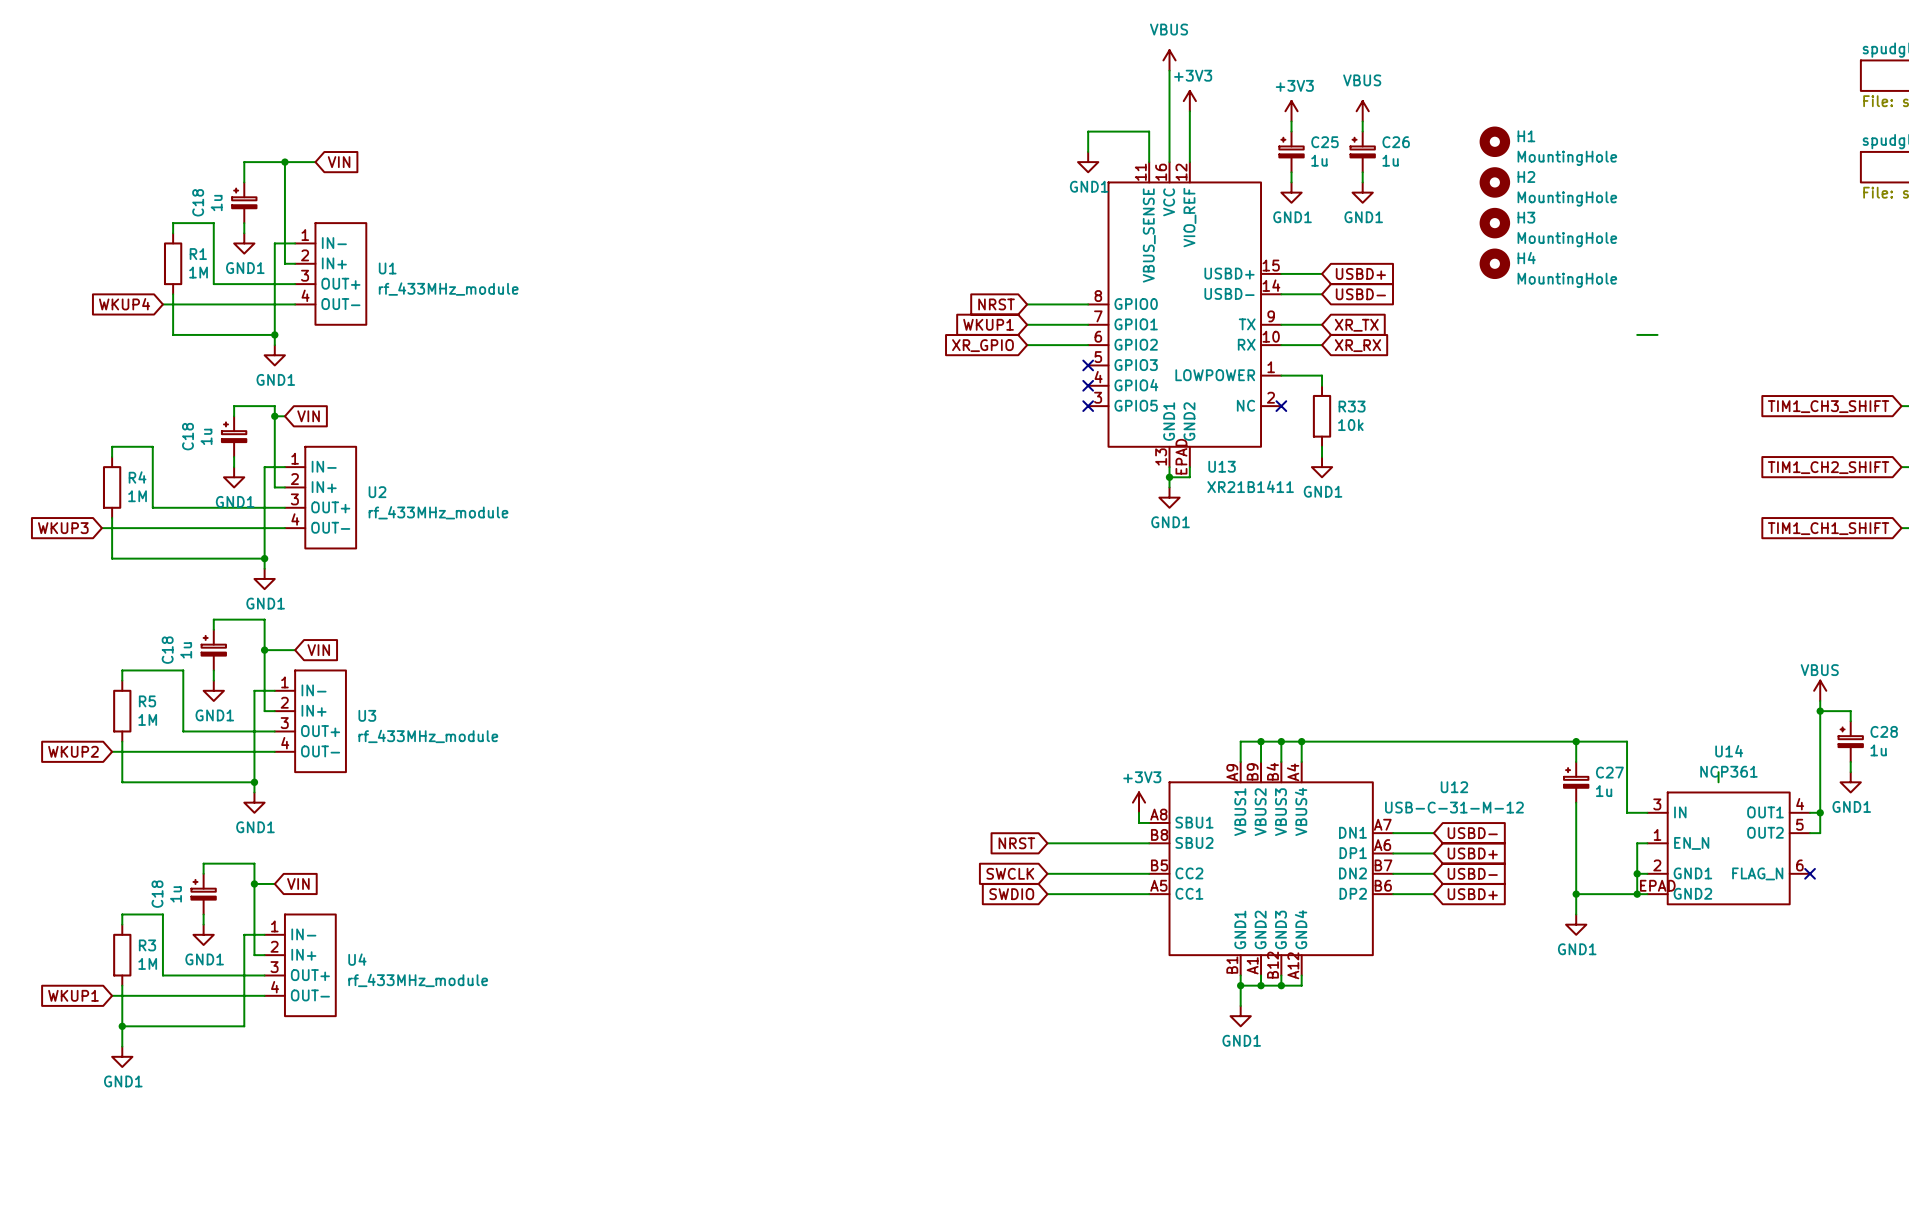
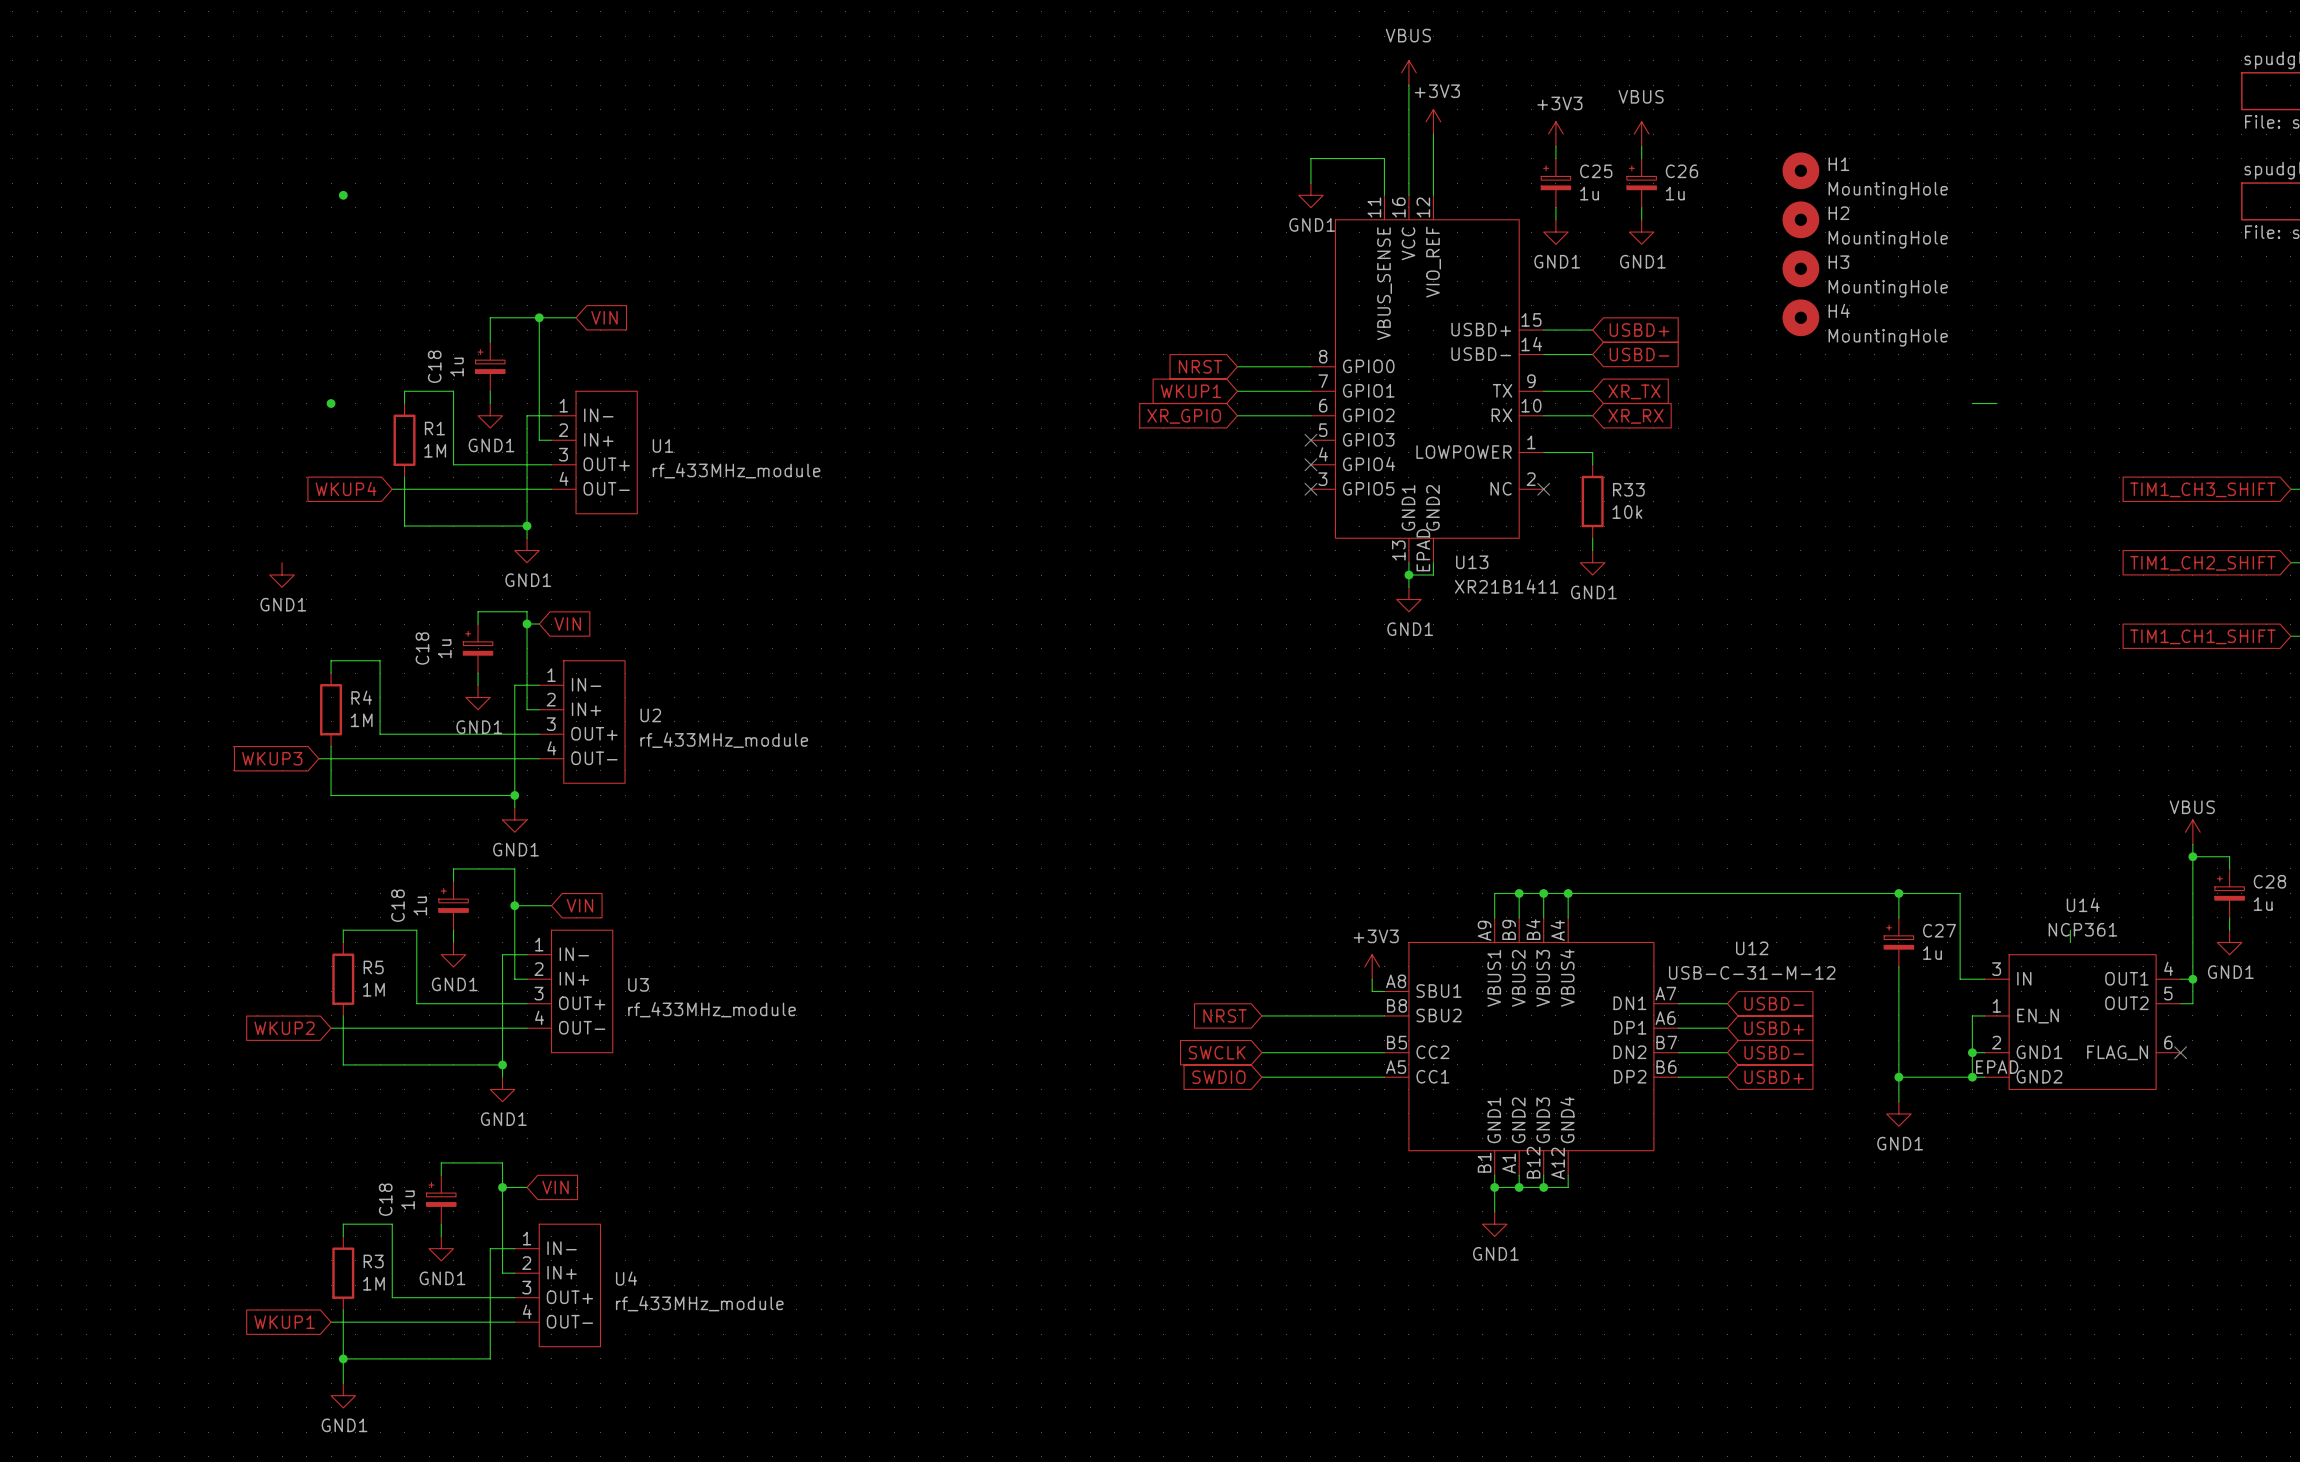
wire: (284, 162) (284, 263) (295, 263) -> (539, 317) (539, 440) (551, 440)
wire: (315, 162) (244, 162) (244, 182) -> (576, 317) (490, 317) (490, 342)
global label: VIN (339, 162) -> none
C18: 1u (244, 202) -> none
wire: (244, 223) (244, 233) -> (490, 391) (490, 403)
wire: (173, 233) (173, 223) (213, 223) (213, 284) (295, 284) -> (404, 403) (404, 391) (453, 391) (453, 464) (551, 464)
power symbol: GND1 (244, 243) -> none
wire: (295, 243) (274, 243) (274, 345) -> (551, 415) (527, 415) (527, 538)
R1 position: (173, 263) -> (404, 440)
junction: none -> (539, 317)
global label: none -> VIN (604, 317)
U1 position: (330, 273) -> (594, 452)
wire: (173, 294) (173, 334) (274, 334) -> (404, 477) (404, 526) (527, 526)
global label position: WKUP4 (124, 304) -> WKUP4 (346, 488)
wire: (162, 304) (295, 304) -> (392, 489) (551, 489)
C18: none -> 1u (490, 366)
power symbol: none -> GND1 (490, 415)
power symbol: GND1 (274, 355) -> none
wire: (234, 416) (234, 406) (274, 406) (274, 487) (284, 487) -> (478, 624) (478, 611) (527, 611) (527, 709) (539, 709)
junction: (274, 416) -> none
global label: VIN (308, 416) -> none
C18: 1u (234, 436) -> none
junction: none -> (527, 526)
wire: (112, 456) (112, 446) (152, 446) (152, 507) (284, 507) -> (331, 673) (331, 660) (380, 660) (380, 734) (539, 734)
wire: (234, 456) (234, 467) -> (478, 673) (478, 685)
power symbol: none -> GND1 (527, 550)
wire: (284, 467) (264, 467) (264, 568) -> (539, 685) (514, 685) (514, 807)
R4 position: (112, 487) -> (331, 709)
U2 position: (320, 497) -> (582, 721)
wire: (112, 517) (112, 558) (264, 558) -> (331, 746) (331, 795) (514, 795)
junction: none -> (527, 624)
global label: none -> VIN (567, 624)
global label position: WKUP3 (63, 528) -> WKUP3 (272, 758)
wire: (101, 528) (284, 528) -> (318, 758) (539, 758)
C18: none -> 1u (478, 648)
junction: (264, 558) -> none
power symbol: GND1 (264, 578) -> none
power symbol: none -> GND1 (478, 697)
wire: (213, 629) (213, 619) (264, 619) (264, 711) (274, 711) -> (453, 881) (453, 868) (514, 868) (514, 979) (527, 979)
C18: 1u (213, 650) -> none
wire: (264, 650) (295, 650) -> (514, 905) (551, 905)
junction: (264, 650) -> none
global label: VIN (318, 650) -> none
junction: none -> (514, 795)
wire: (213, 670) (213, 680) -> (453, 930) (453, 942)
wire: (122, 680) (122, 670) (183, 670) (183, 731) (274, 731) -> (343, 942) (343, 930) (416, 930) (416, 1003) (527, 1003)
power symbol: none -> GND1 (514, 819)
power symbol: GND1 (213, 690) -> none
wire: (274, 690) (254, 690) (254, 792) -> (527, 954) (502, 954) (502, 1077)
R5 position: (122, 711) -> (343, 979)
U3 position: (310, 721) -> (569, 991)
wire: (122, 741) (122, 782) (254, 782) -> (343, 1015) (343, 1064) (502, 1064)
global label position: WKUP2 (73, 751) -> WKUP2 (284, 1028)
wire: (112, 751) (274, 751) -> (331, 1028) (527, 1028)
C18: none -> 1u (453, 905)
junction: none -> (514, 905)
global label: none -> VIN (579, 905)
junction: (254, 782) -> none
power symbol: none -> GND1 (453, 954)
power symbol: GND1 (254, 802) -> none
wire: (203, 873) (203, 863) (254, 863) (254, 955) (264, 955) -> (441, 1175) (441, 1162) (502, 1162) (502, 1273) (514, 1273)
wire: (254, 883) (274, 883) -> (502, 1187) (527, 1187)
junction: (254, 883) -> none
global label: VIN (298, 883) -> none
junction: none -> (502, 1064)
C18: 1u (203, 894) -> none
power symbol: none -> GND1 (502, 1089)
wire: (203, 914) (203, 924) -> (441, 1224) (441, 1236)
wire: (122, 924) (122, 914) (162, 914) (162, 975) (264, 975) -> (343, 1236) (343, 1224) (392, 1224) (392, 1297) (514, 1297)
power symbol: GND1 (203, 934) -> none
wire: (264, 934) (244, 934) (244, 1026) (122, 1026) -> (514, 1248) (490, 1248) (490, 1358) (343, 1358)
R3 position: (122, 955) -> (343, 1273)
U4 position: (300, 965) -> (557, 1285)
wire: (122, 985) (122, 1046) -> (343, 1309) (343, 1383)
junction: none -> (502, 1187)
global label: none -> VIN (555, 1187)
global label position: WKUP1 (73, 995) -> WKUP1 (284, 1322)
wire: (112, 995) (264, 995) -> (331, 1322) (514, 1322)
C18: none -> 1u (441, 1199)
junction: (122, 1026) -> none
power symbol: none -> GND1 (441, 1248)
power symbol: GND1 (122, 1056) -> none
junction: none -> (343, 1358)
power symbol: none -> GND1 (343, 1395)

